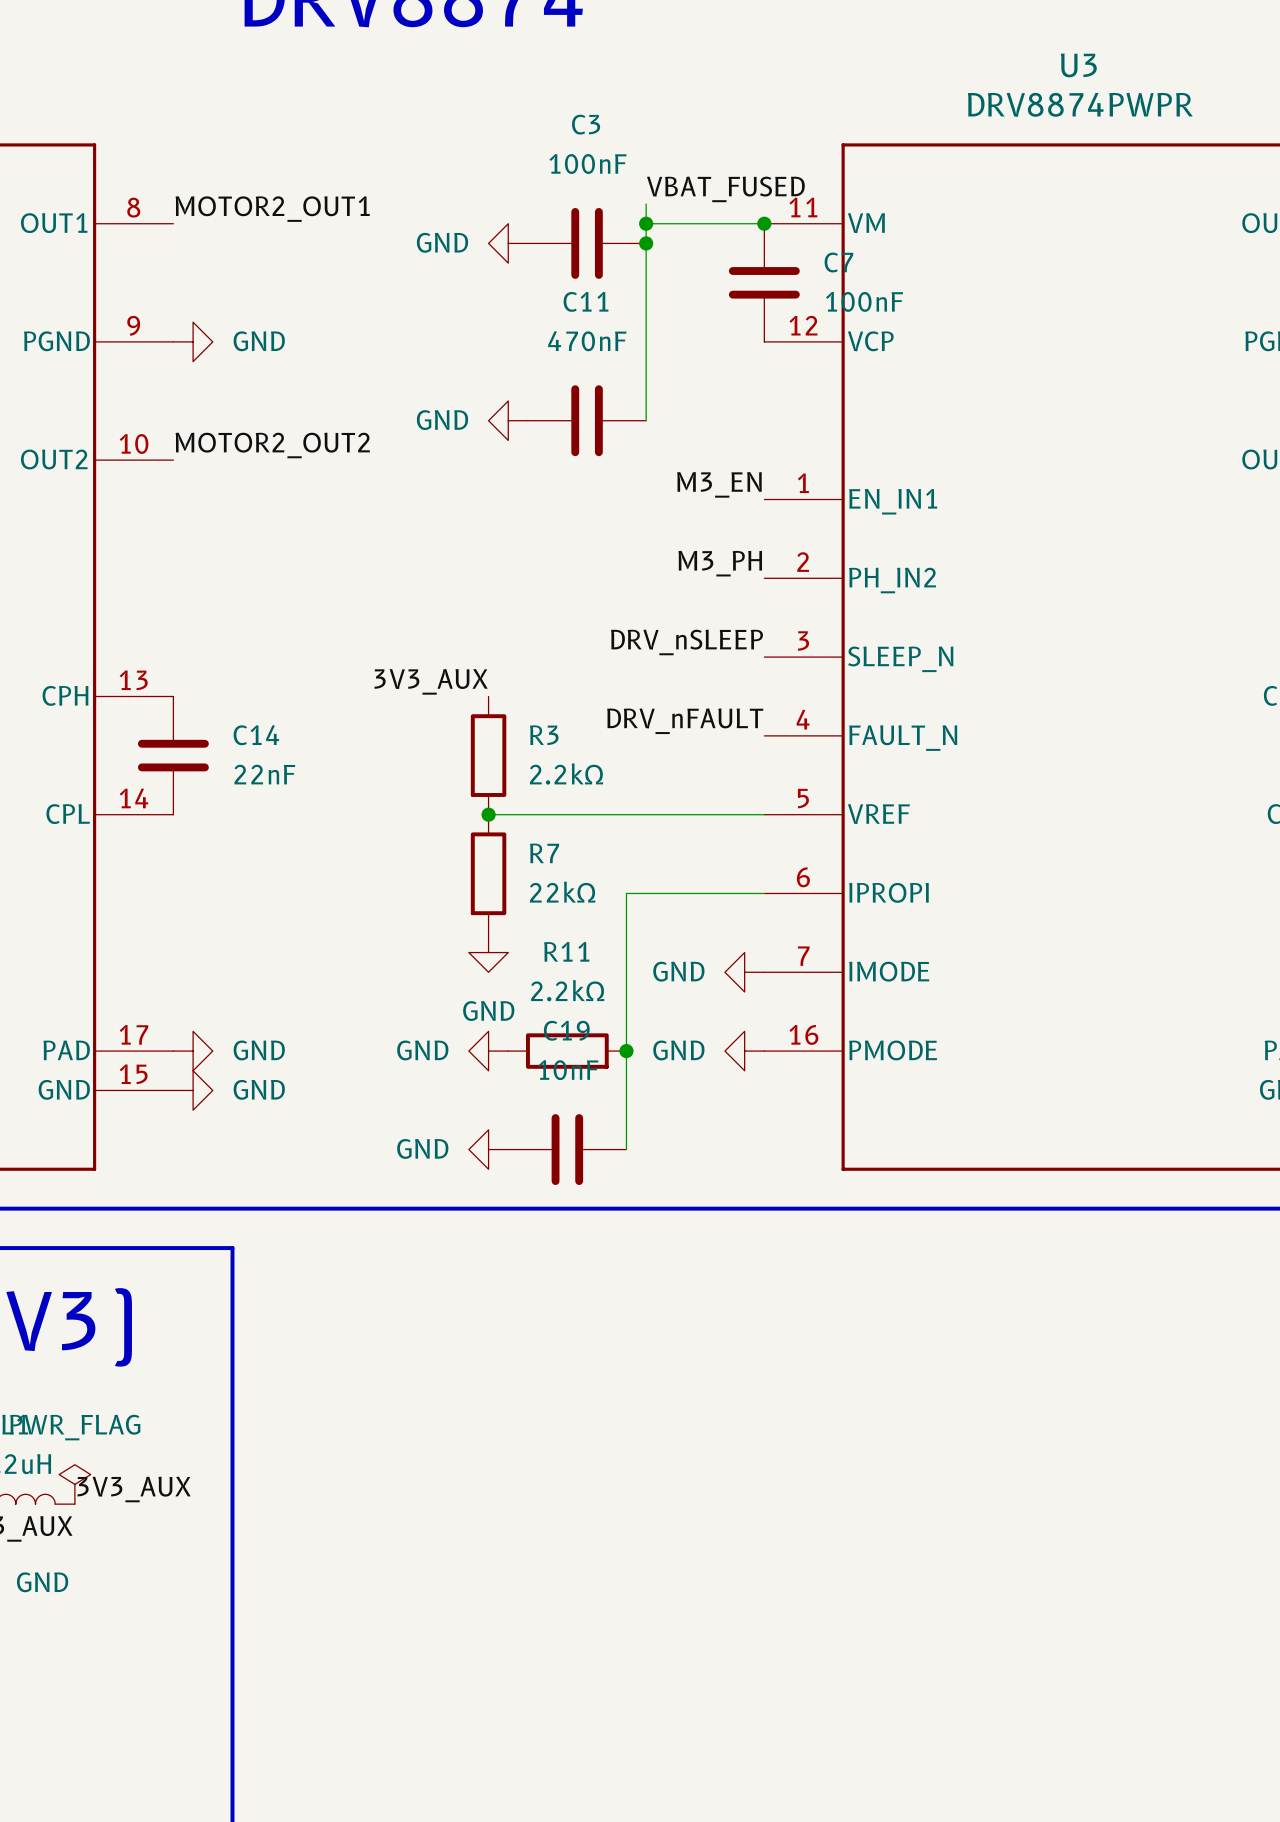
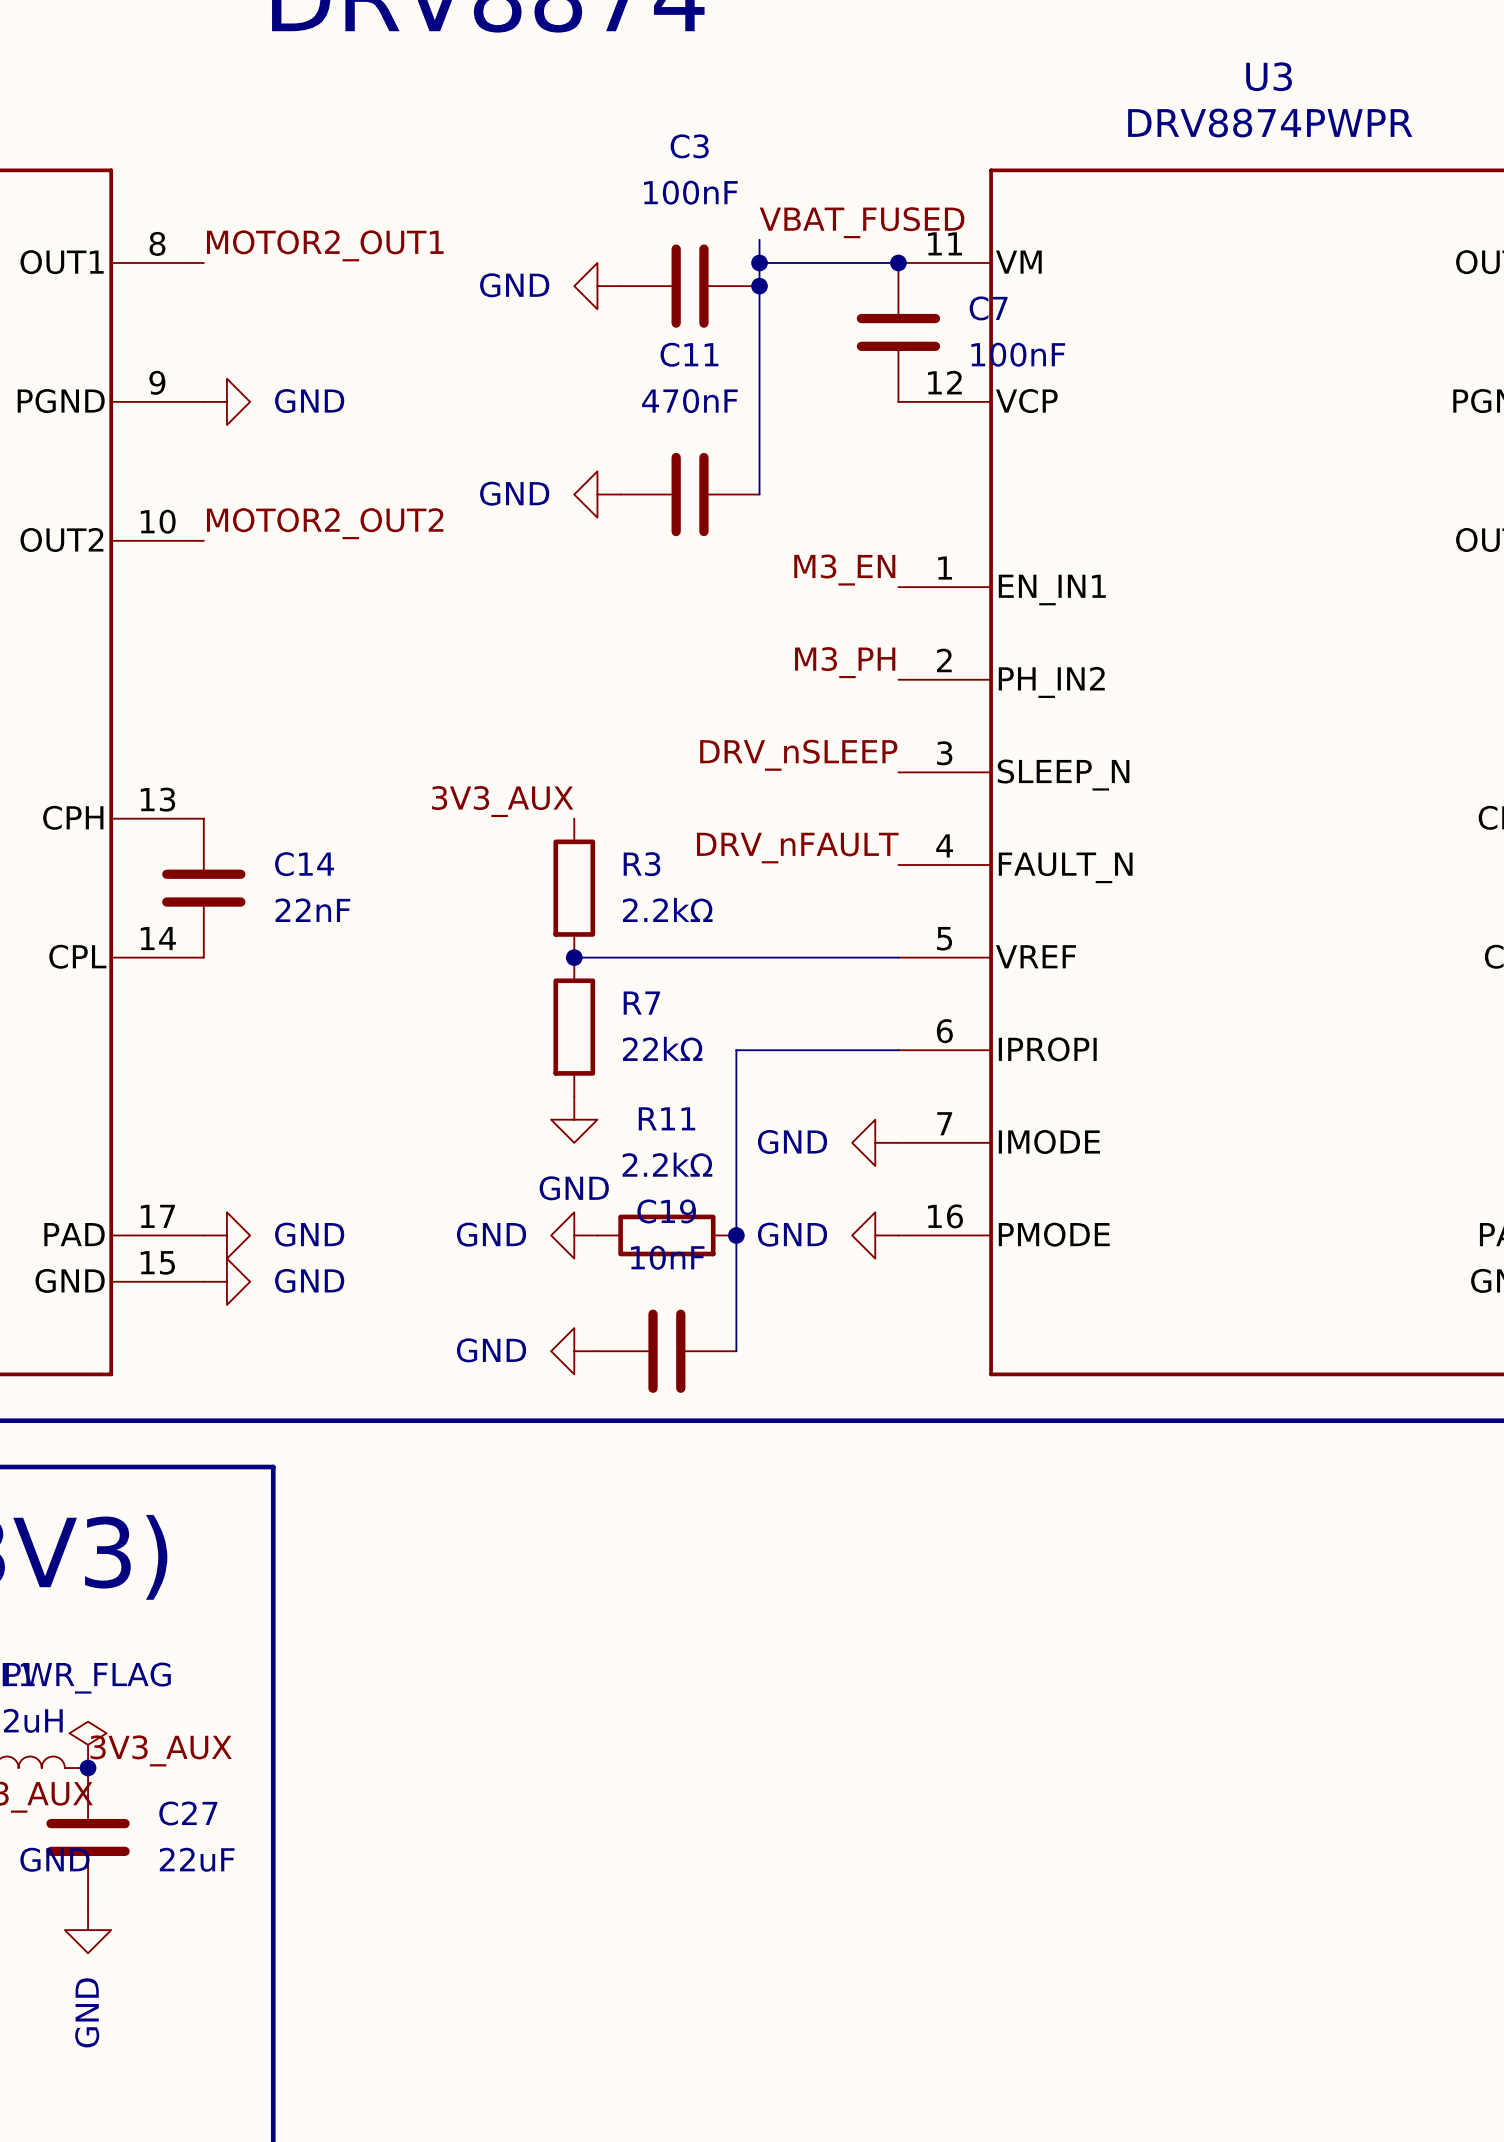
junction: none -> (88, 1768)
C27: none -> 22uF (88, 1837)
power symbol: none -> GND (88, 1930)

